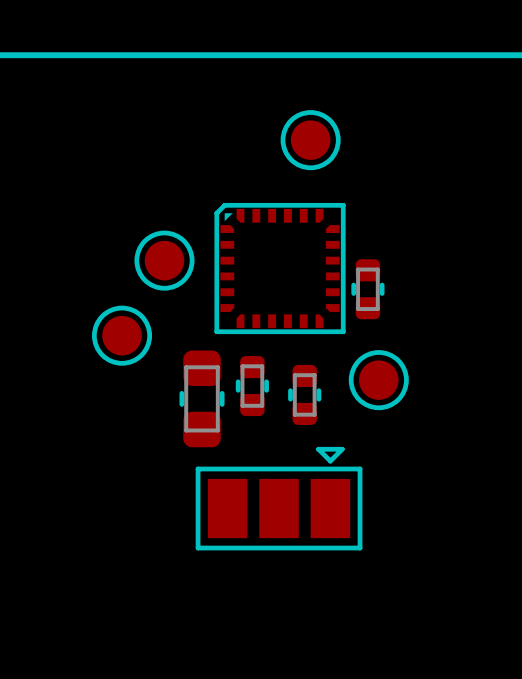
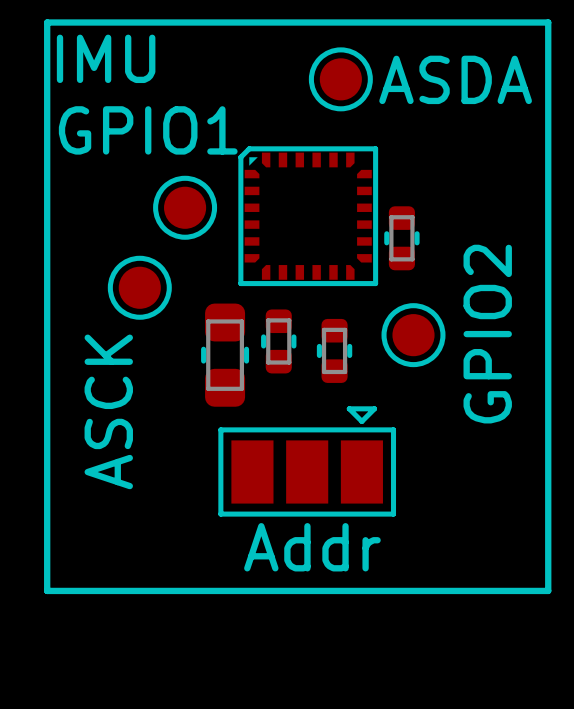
line: none -> (47, 22) (548, 22) (548, 590) (47, 590) (47, 22)
text: none -> IMU (106, 58)
text: none -> ASDA (455, 79)
text: none -> GPIO1 (148, 130)
text: none -> GPIO2 (487, 334)
text: none -> ASCK (108, 411)
text: none -> Addr (312, 547)

